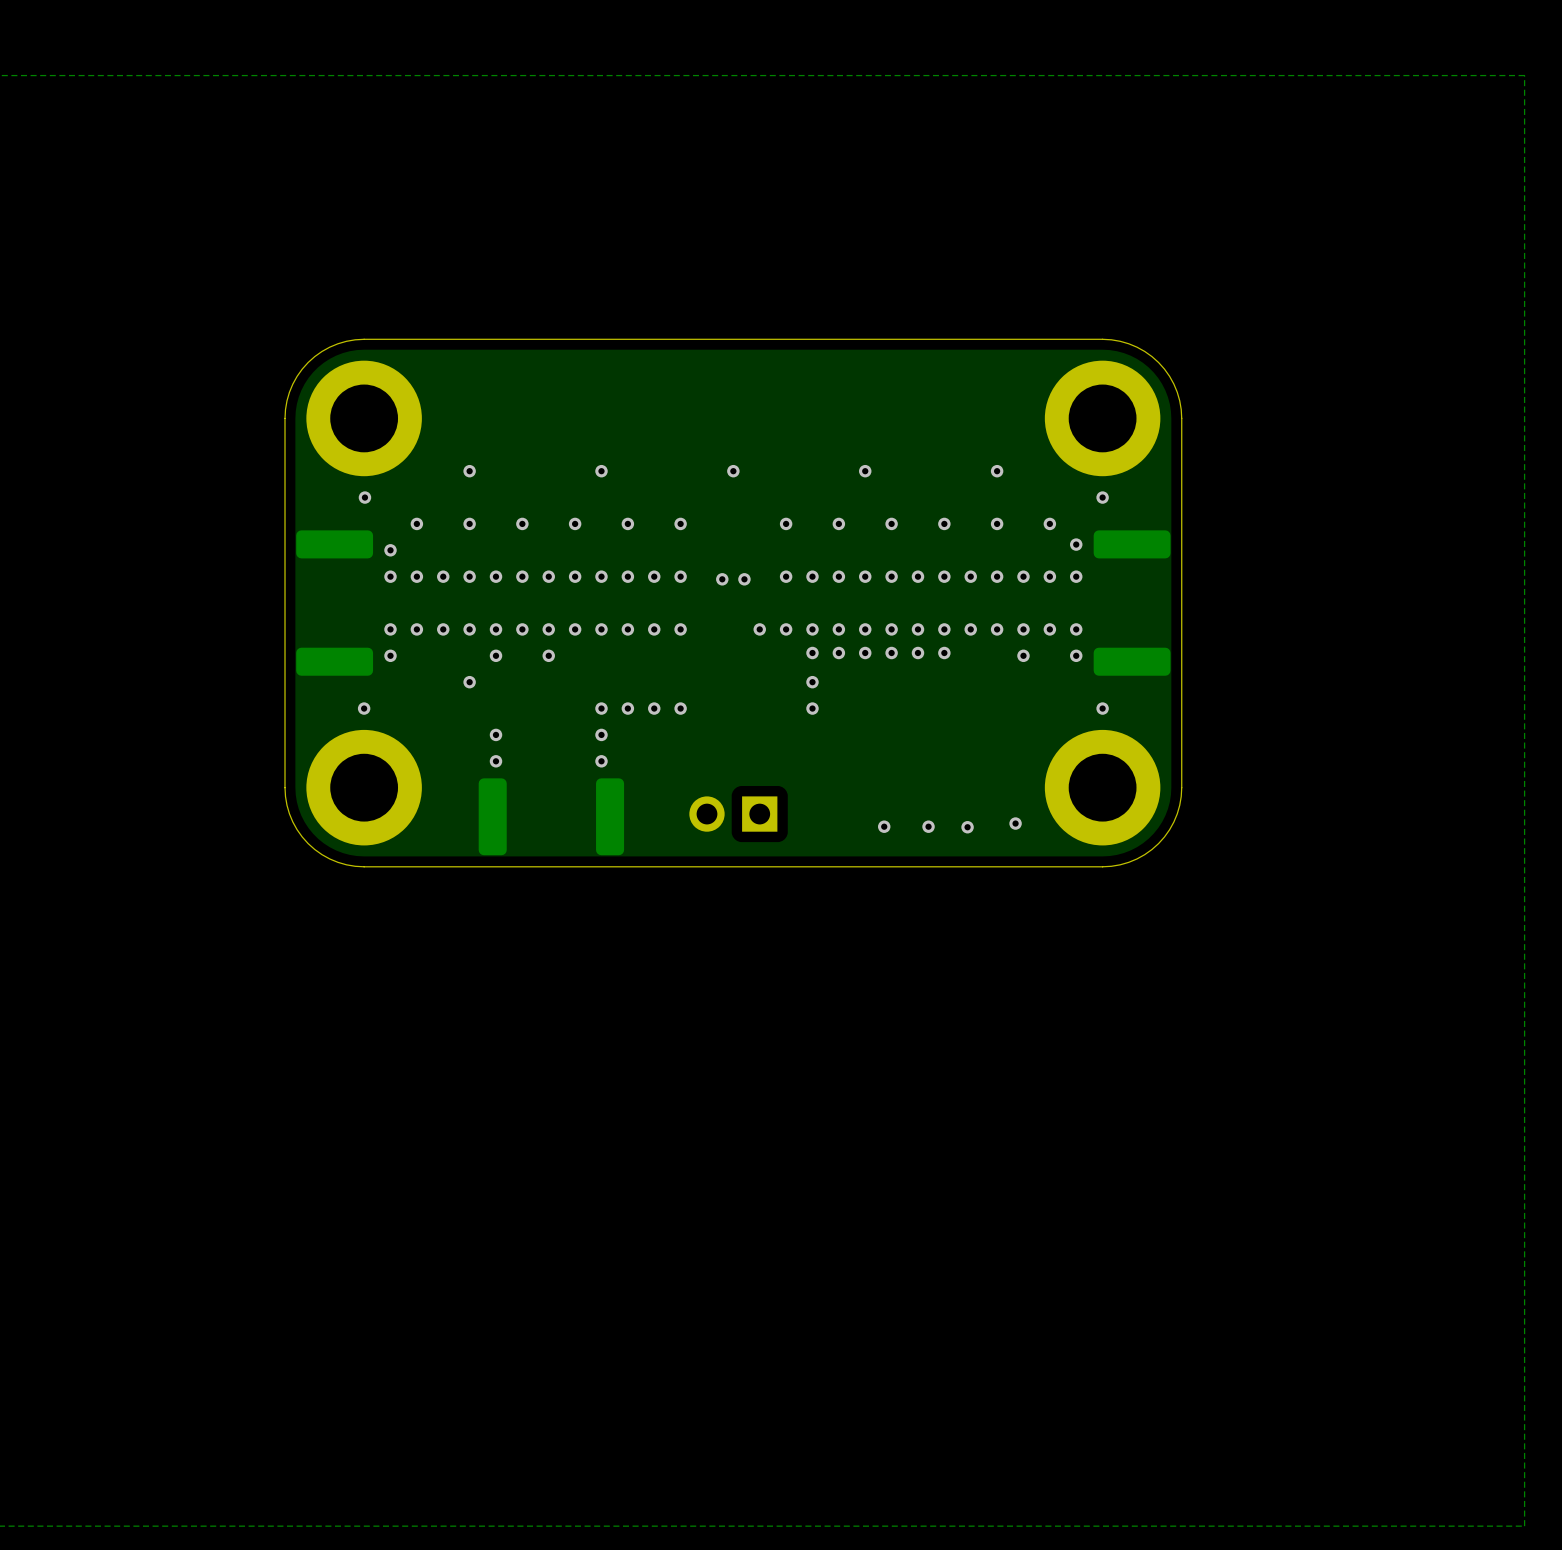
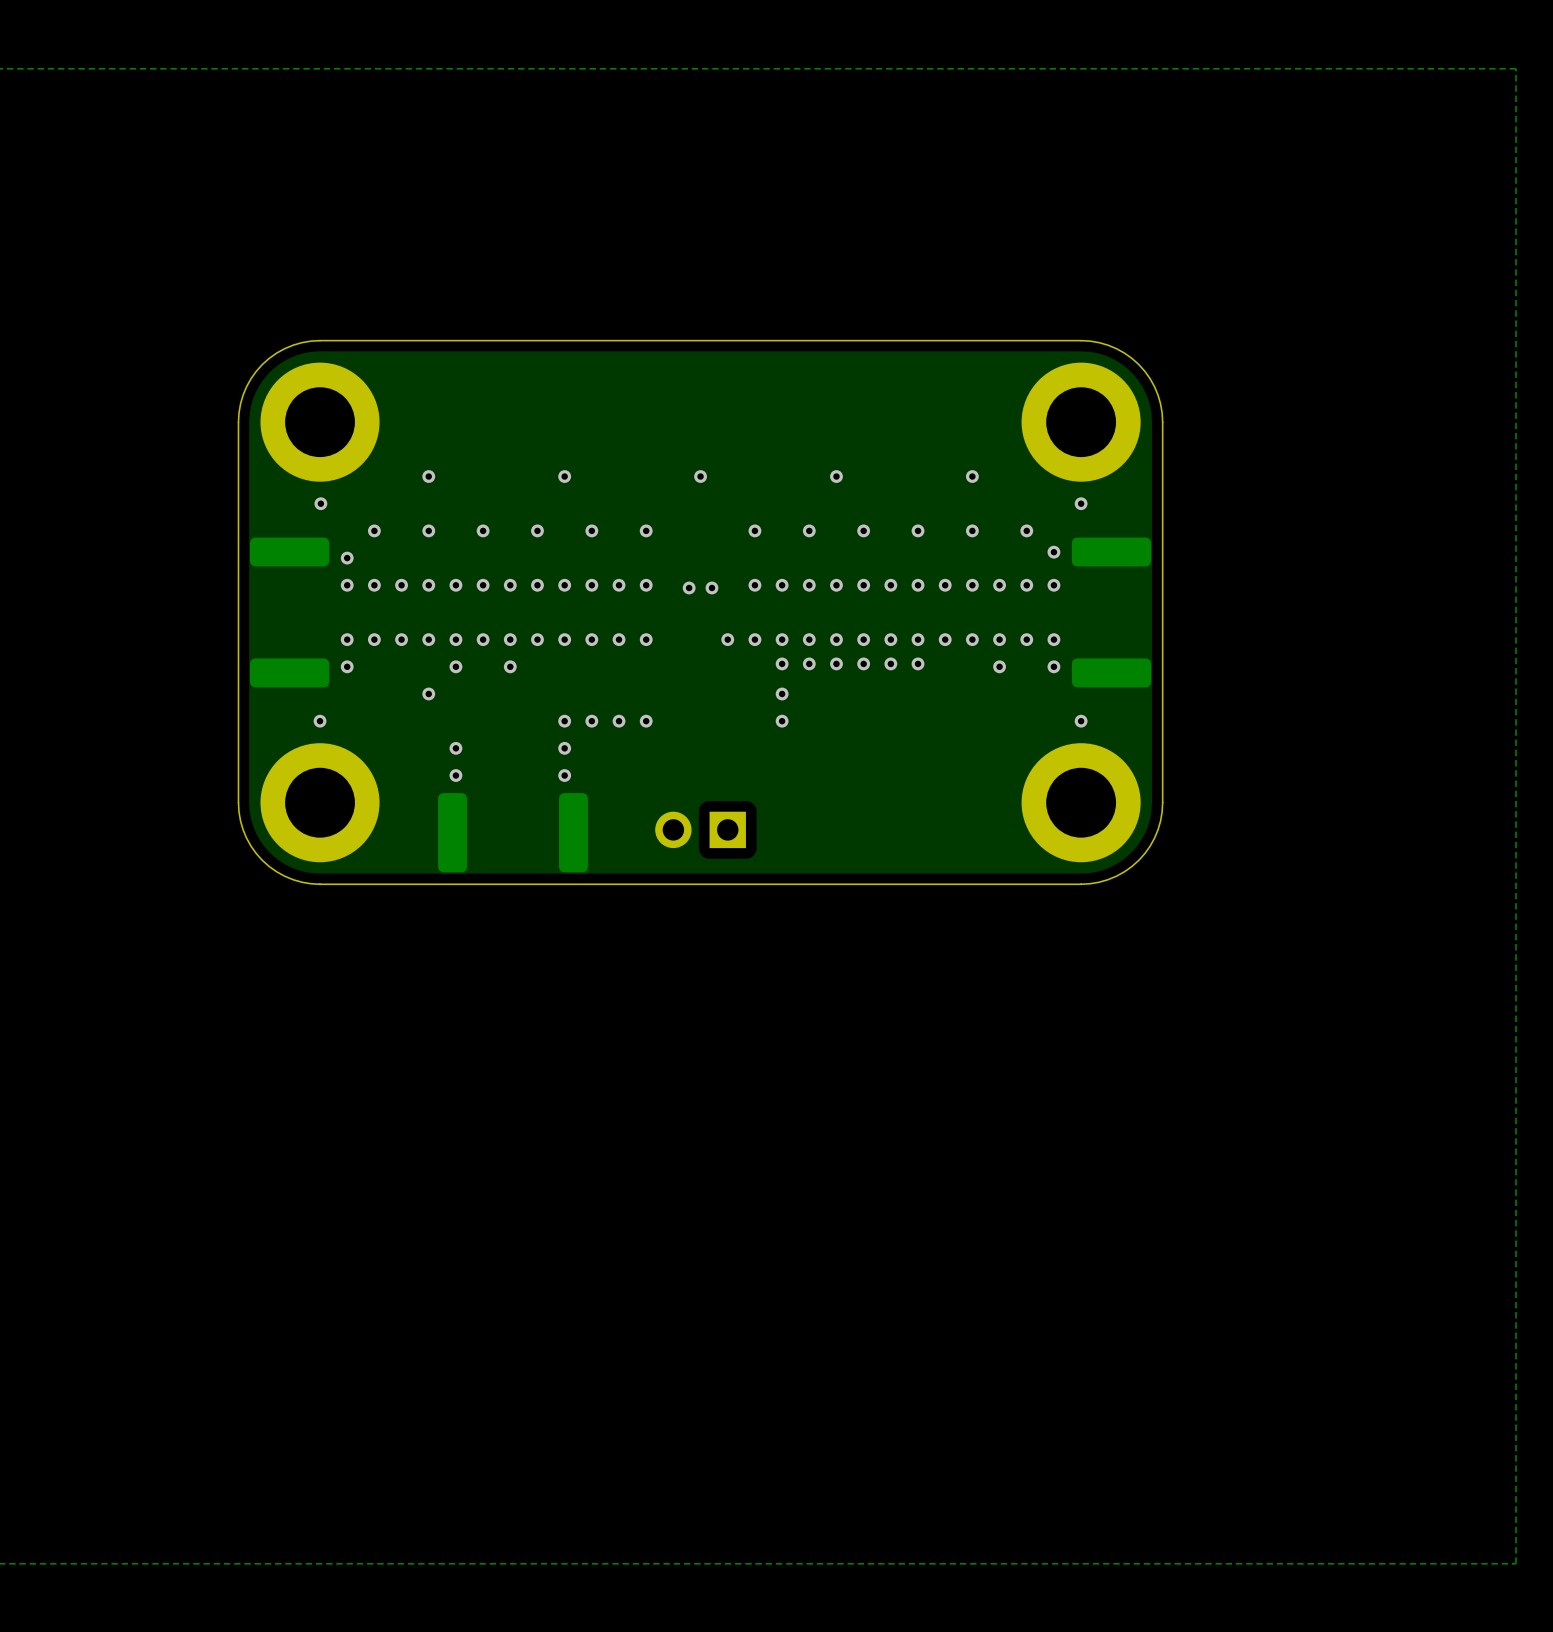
via: (1015, 823) -> none
via: (884, 826) -> none
via: (928, 826) -> none
via: (967, 827) -> none

